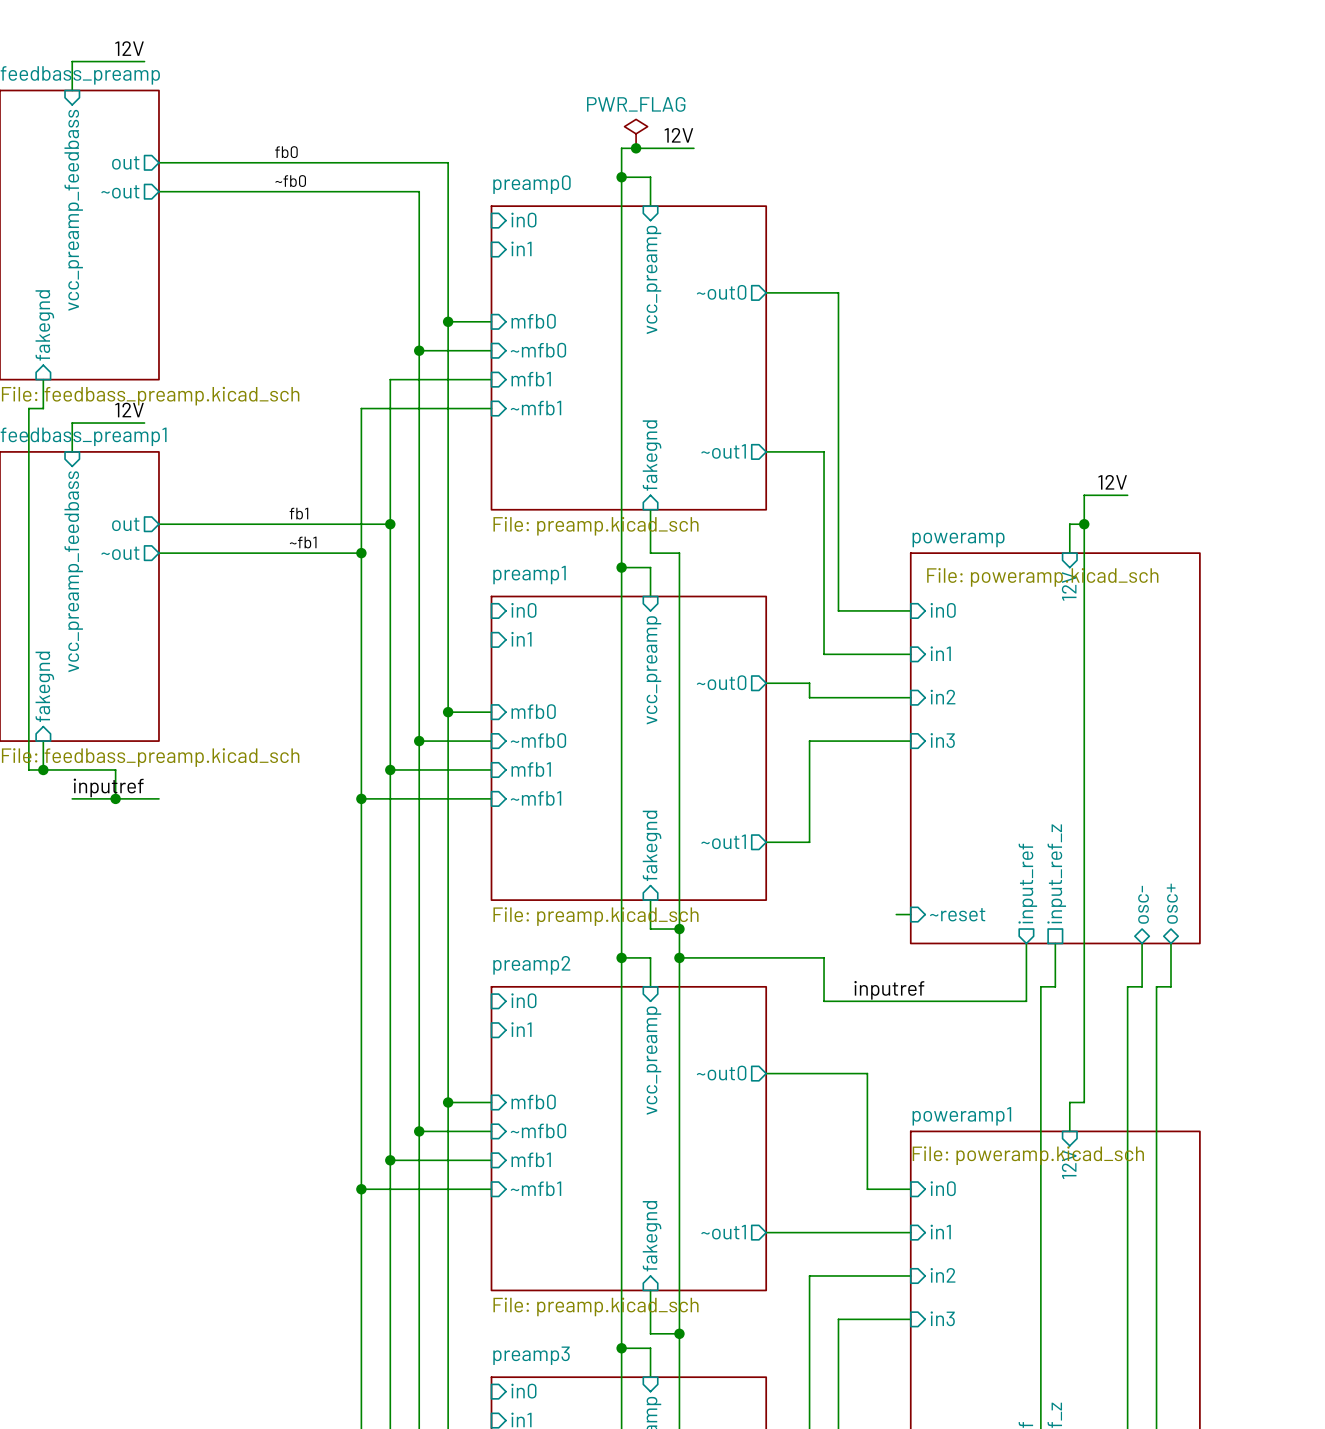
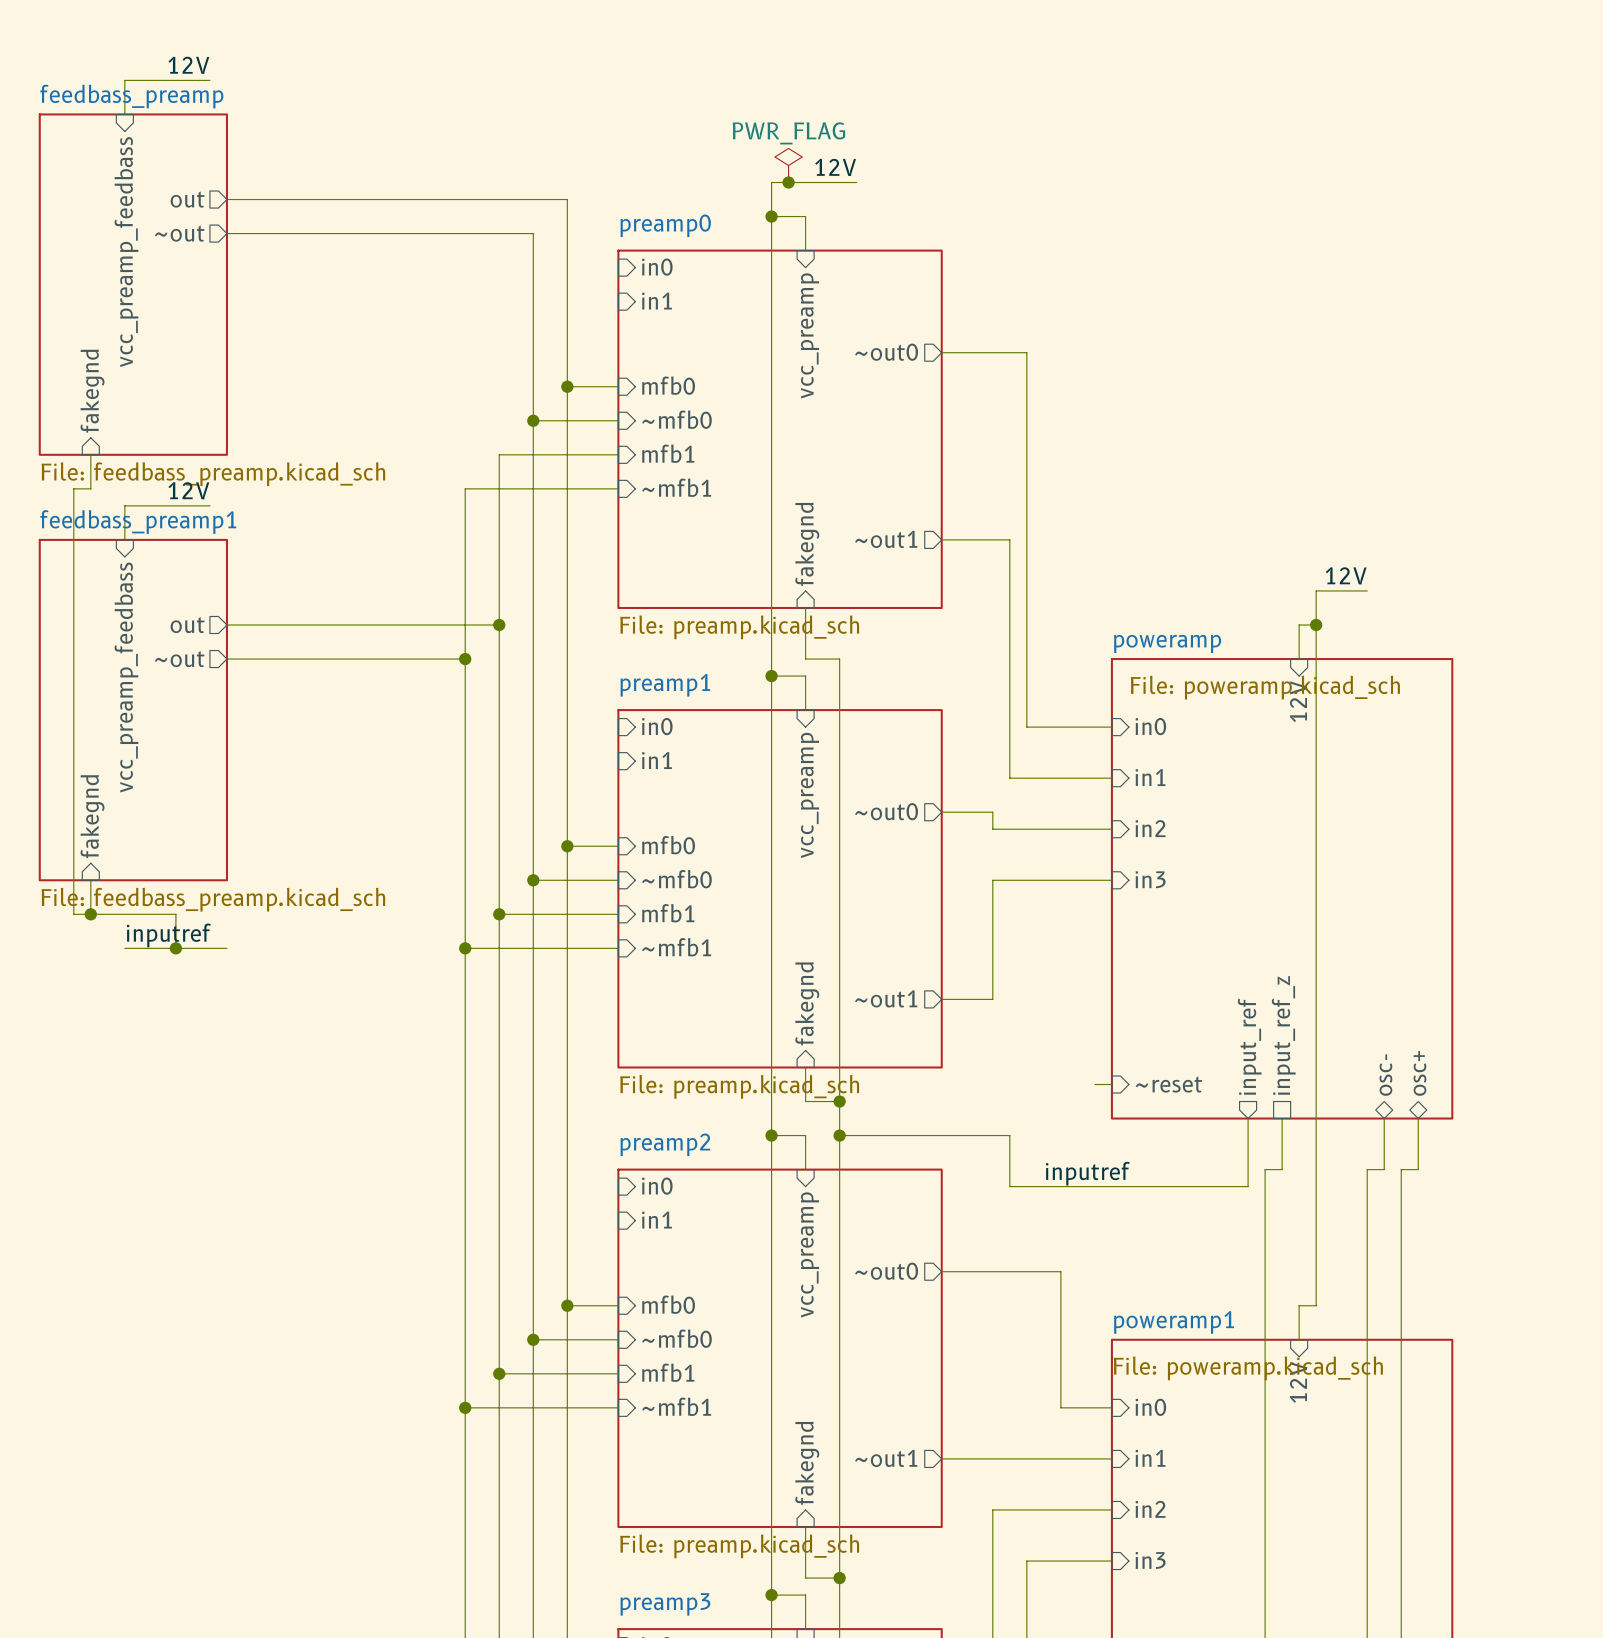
label: fb0 (286, 152) -> none
label: ~fb0 (290, 181) -> none
label: fb1 (298, 513) -> none
label: ~fb1 (303, 542) -> none

